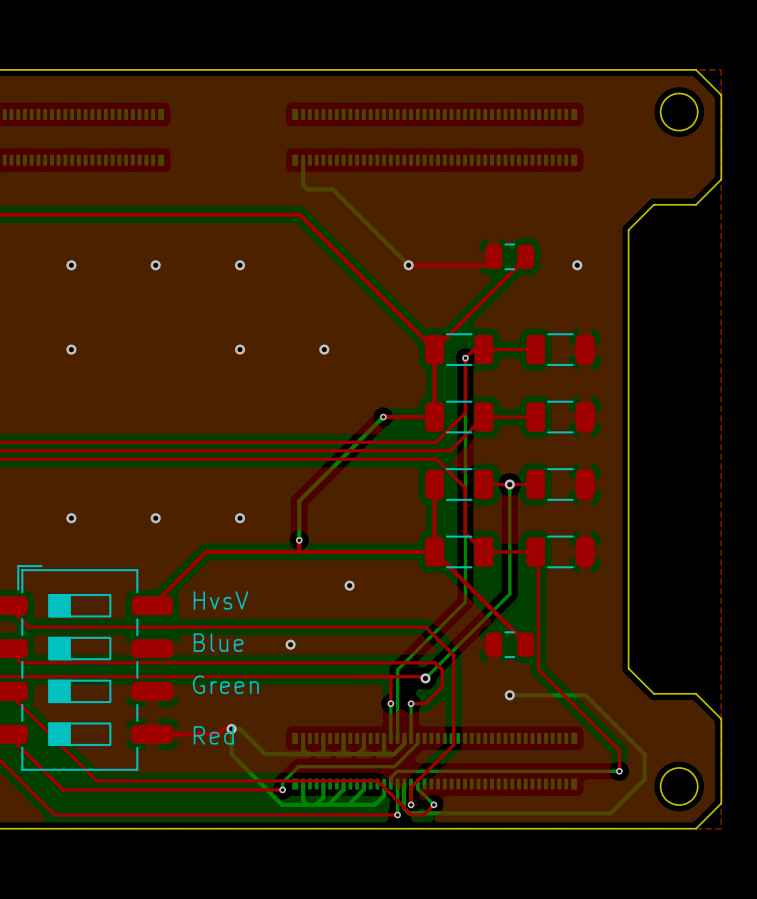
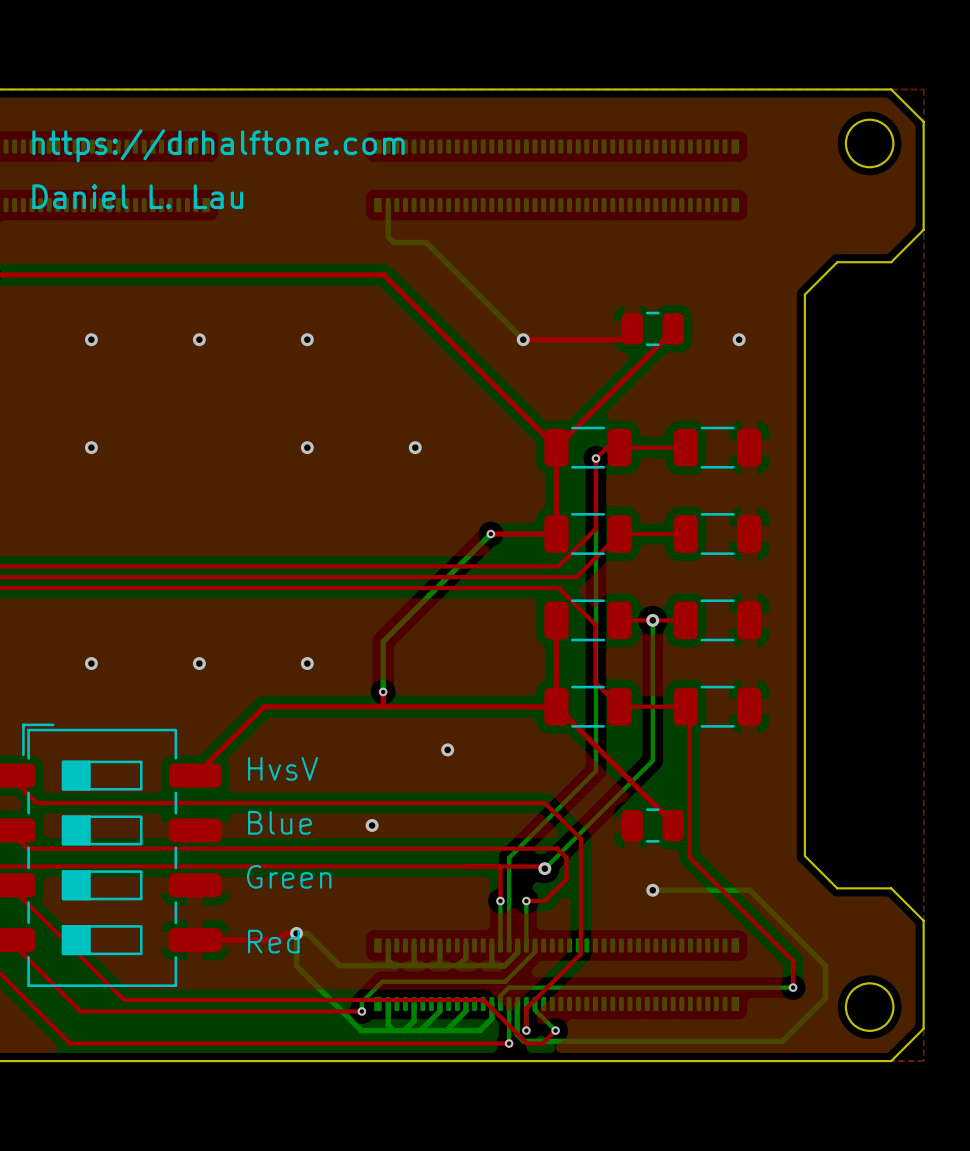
text: none -> https://drhalftone.com (218, 145)
text: none -> Daniel L. Lau (137, 196)

